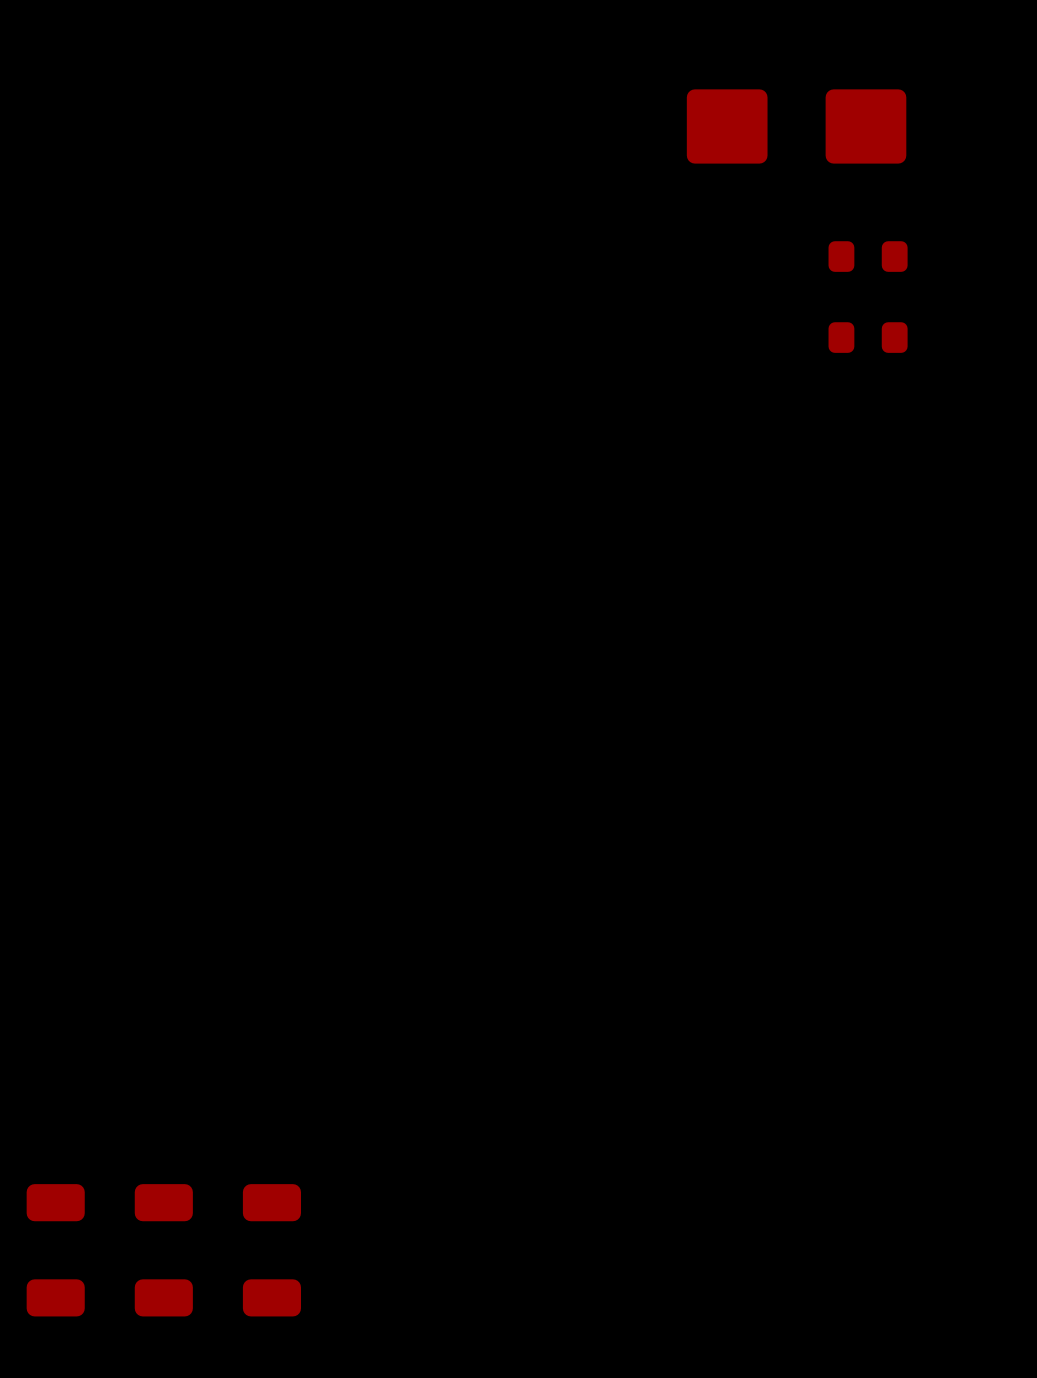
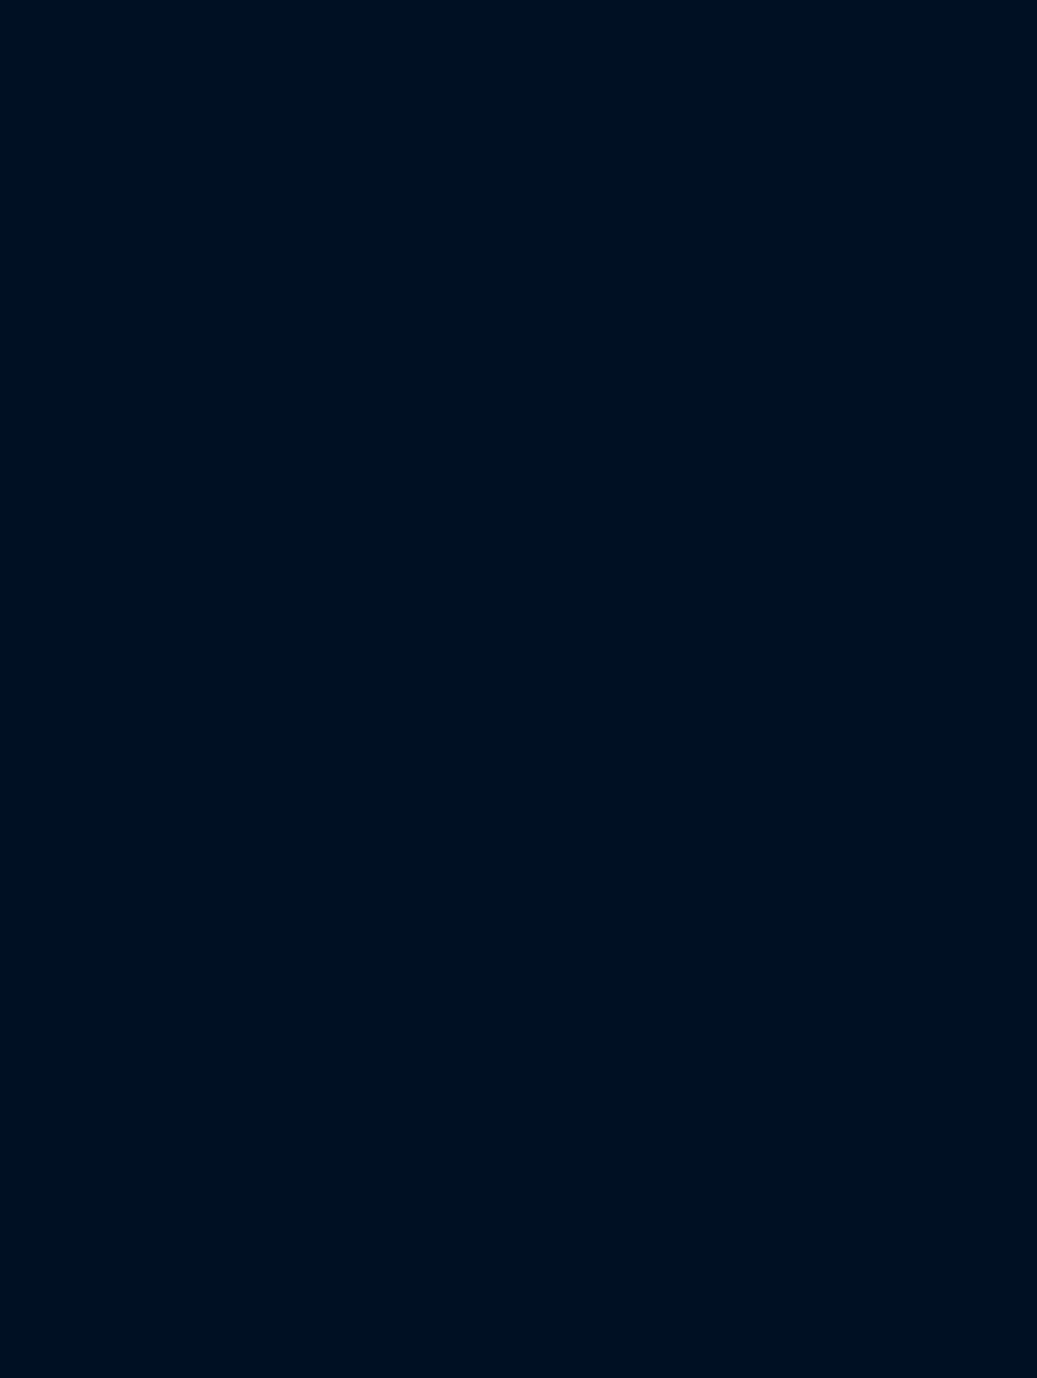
part: (796, 126) -> none
part: (868, 256) -> none
part: (868, 337) -> none
part: (55, 1250) -> none
part: (163, 1250) -> none
part: (271, 1250) -> none

